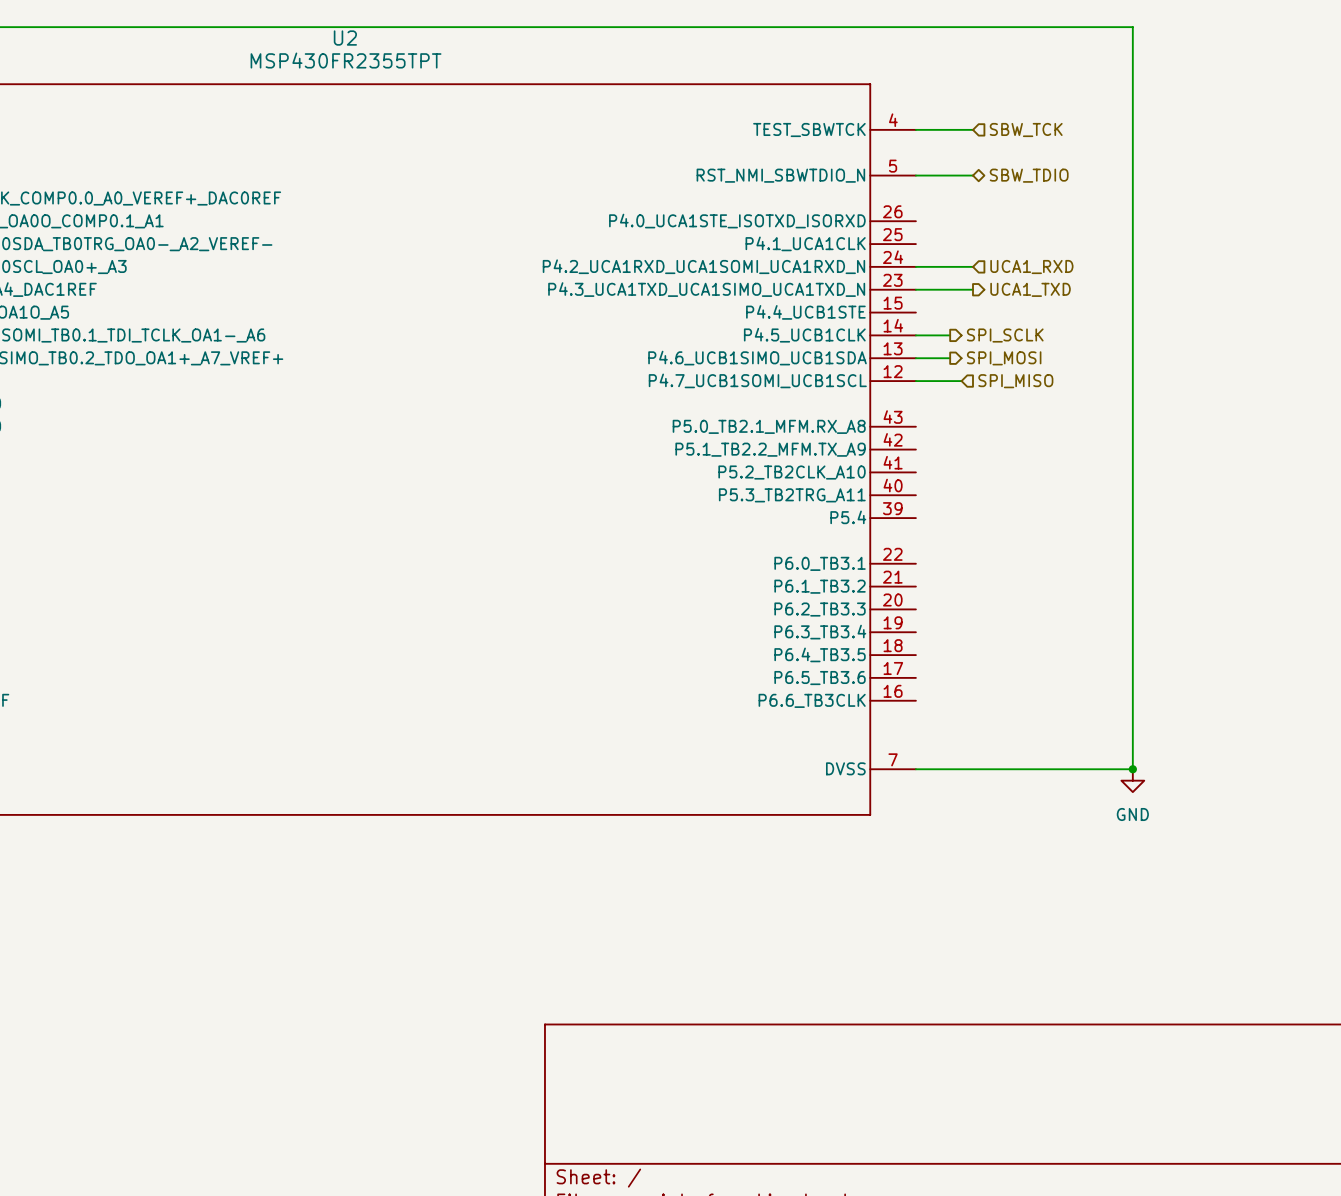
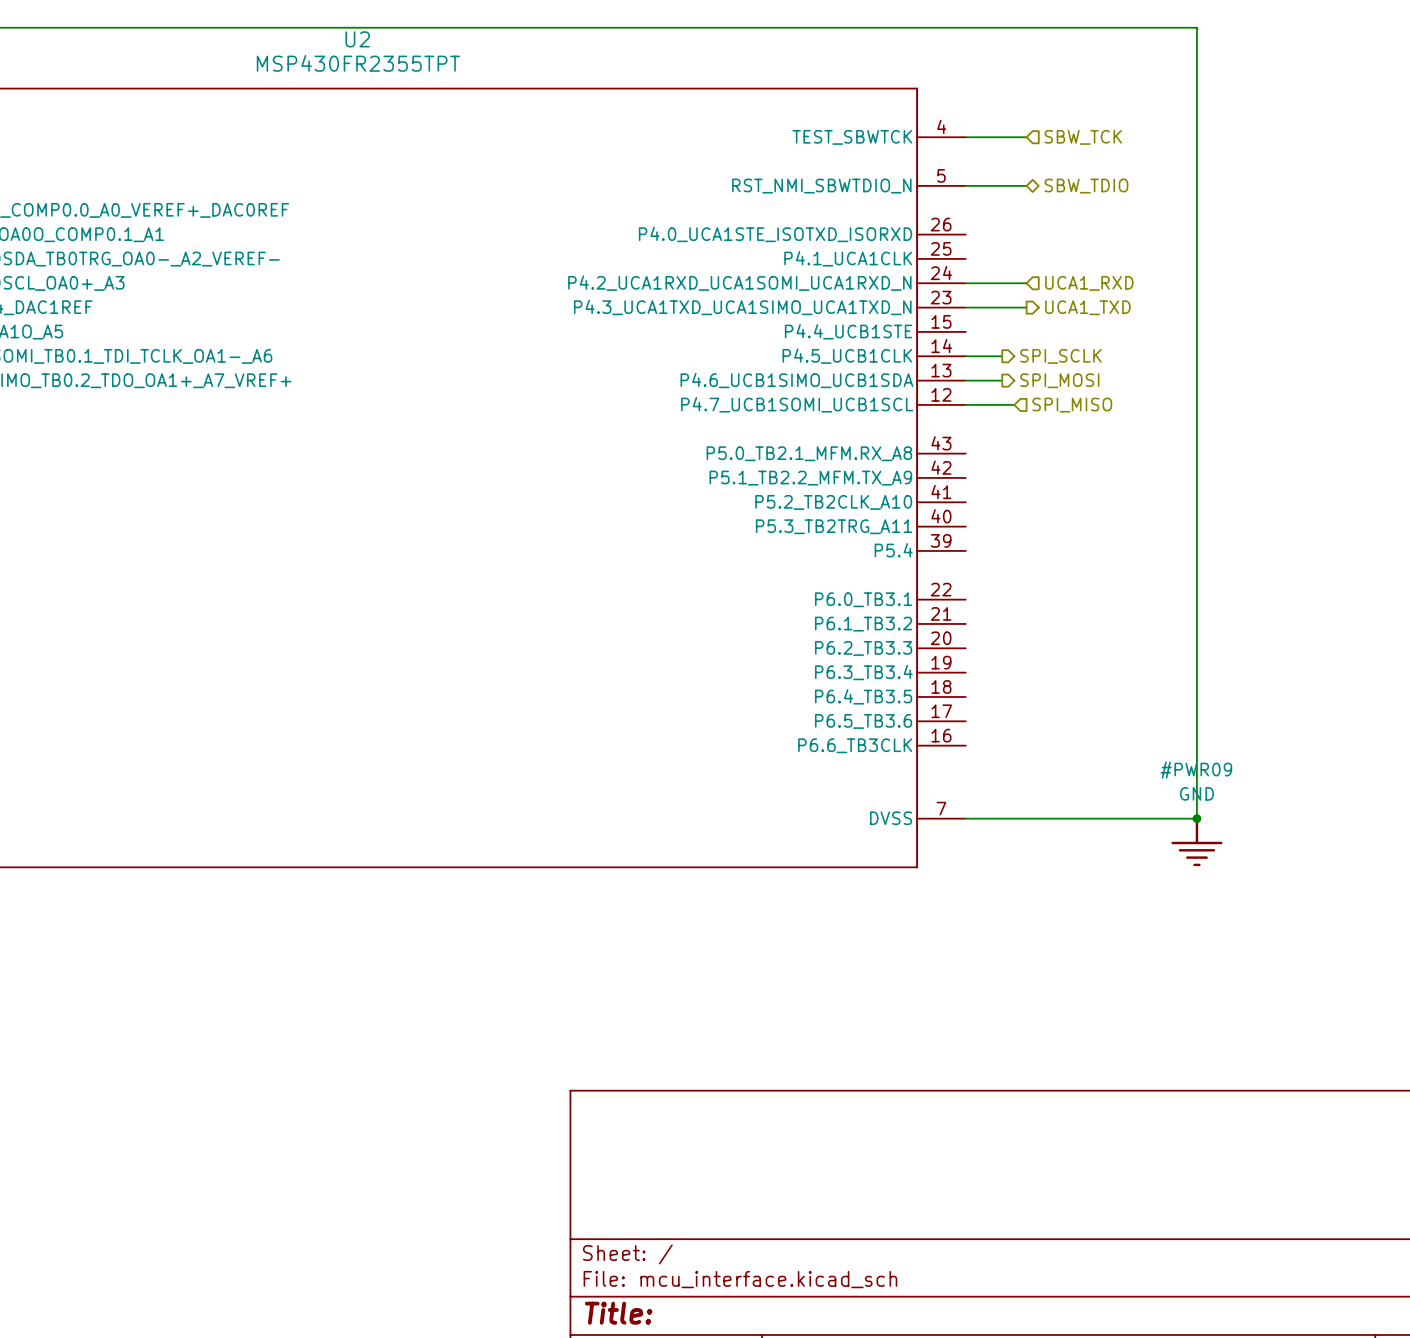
power symbol: GND (1132, 780) -> none
#PWR09: none -> GND (1196, 841)

